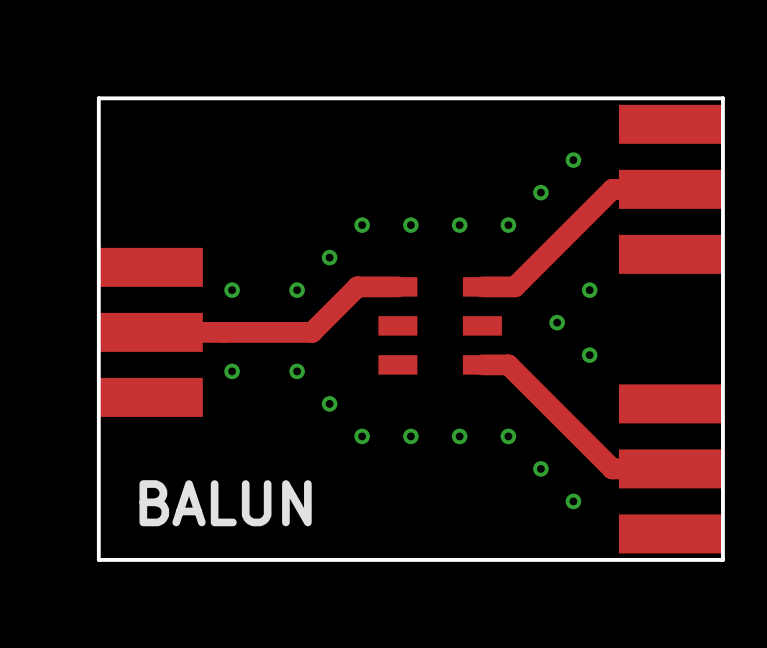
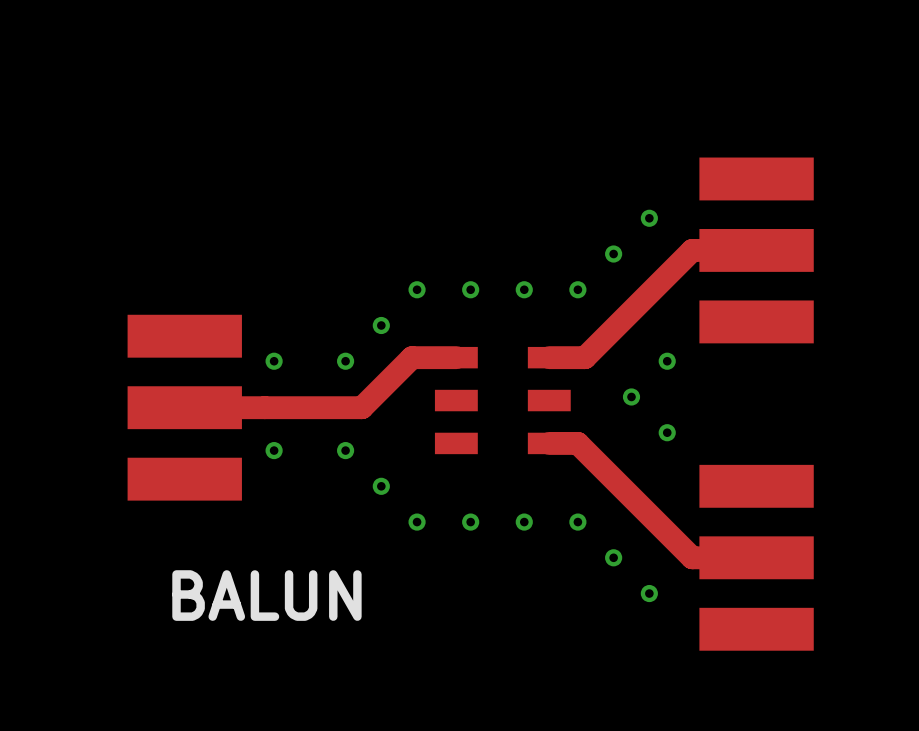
board edge: (98, 98) (98, 559) (722, 559) (722, 98) (98, 98) -> none

